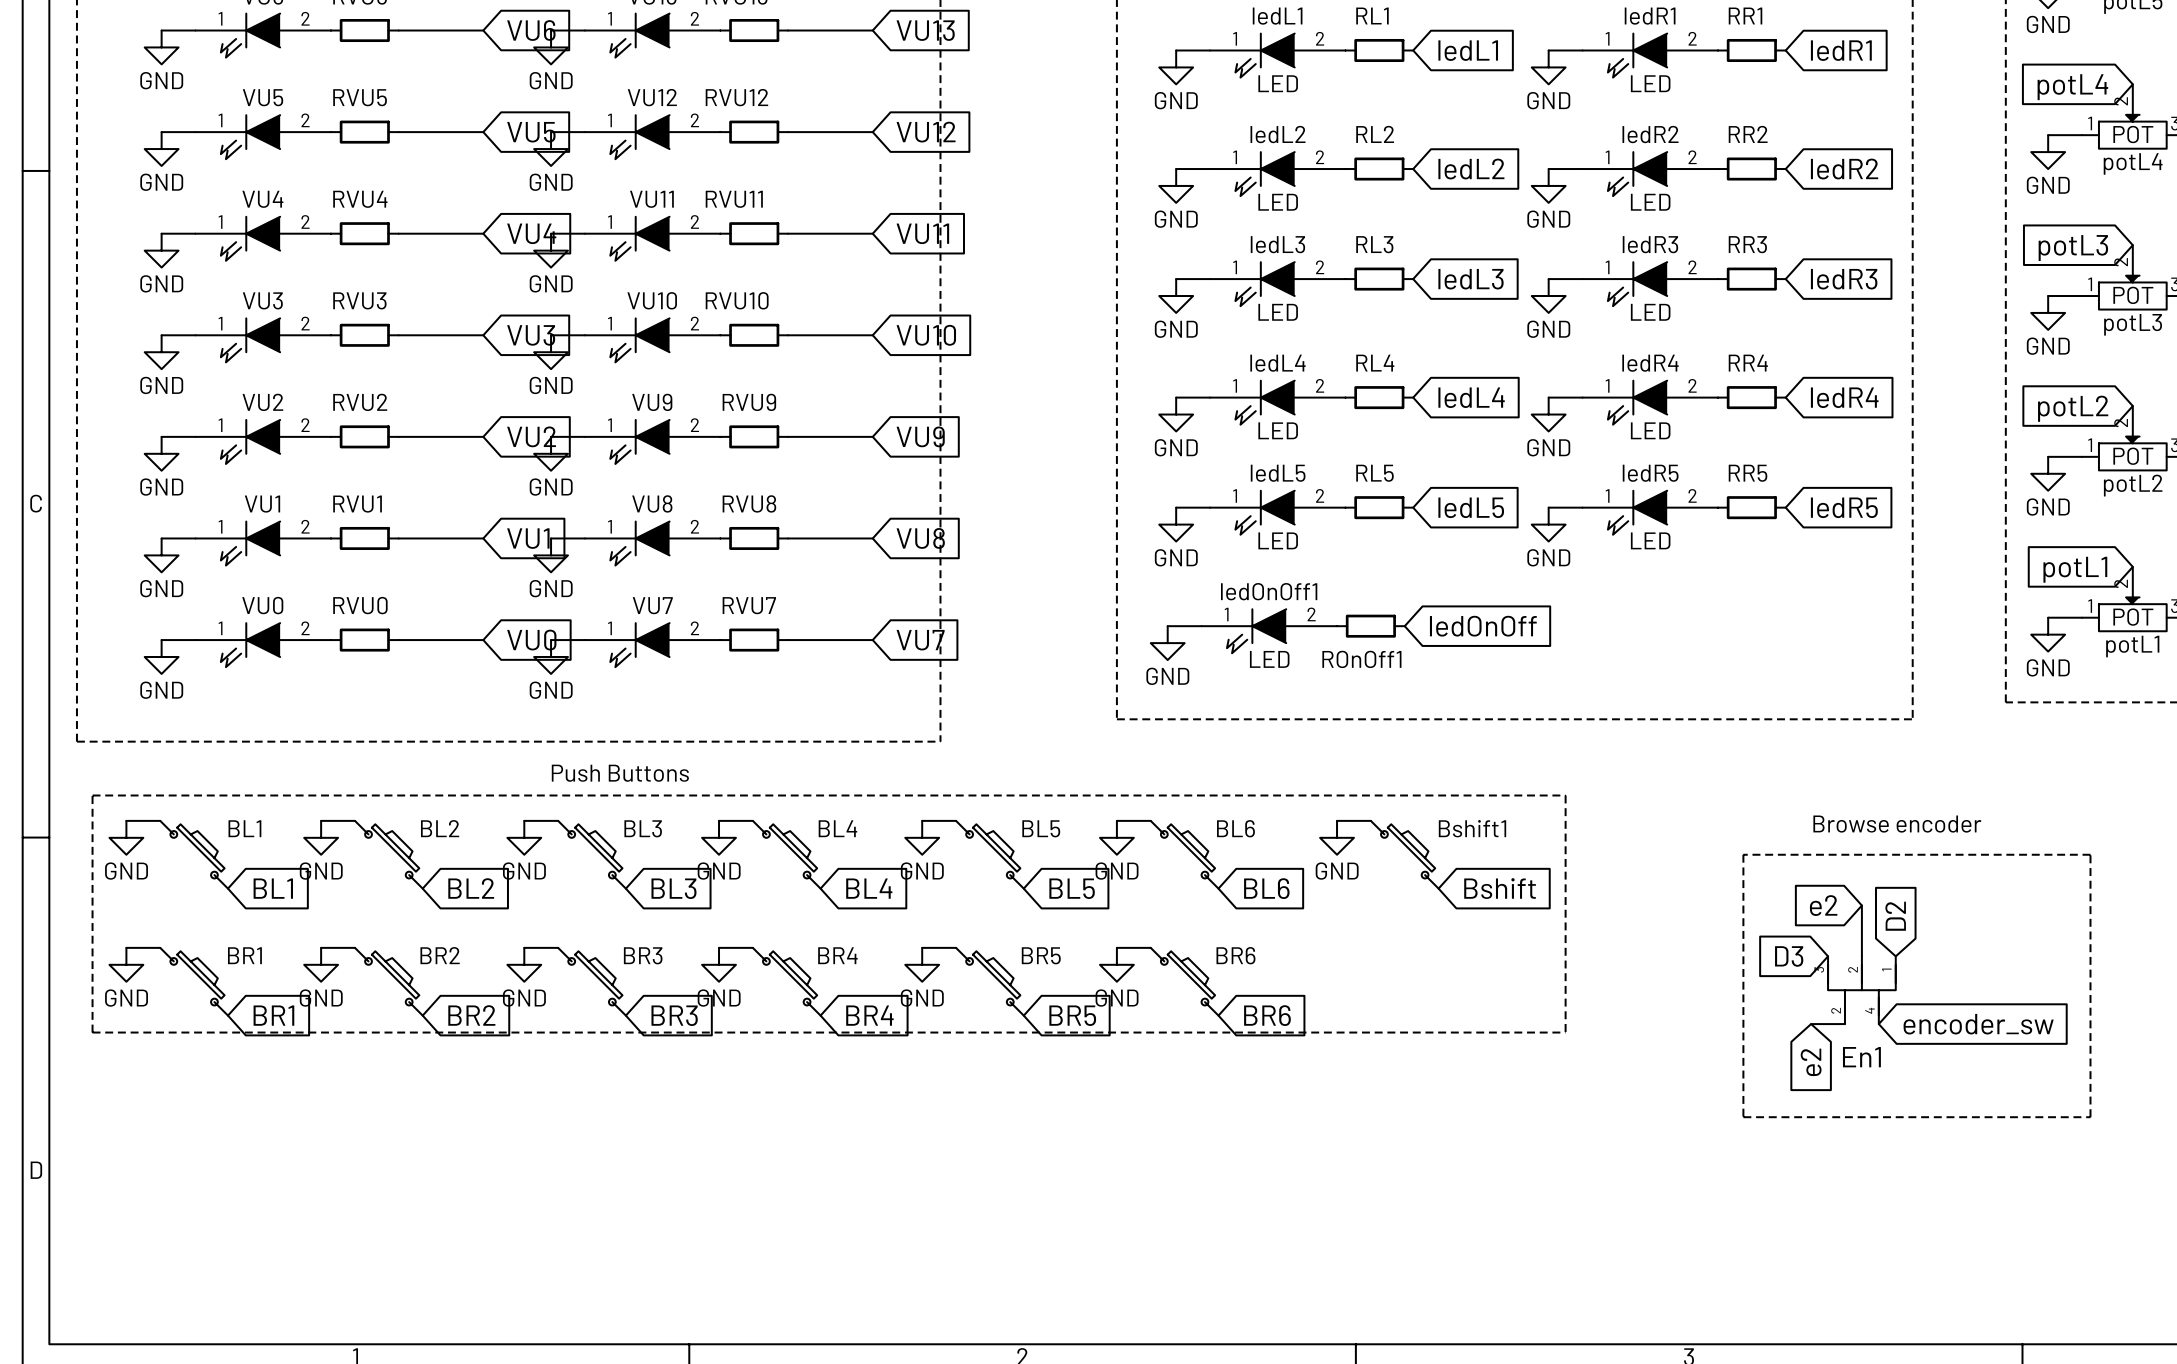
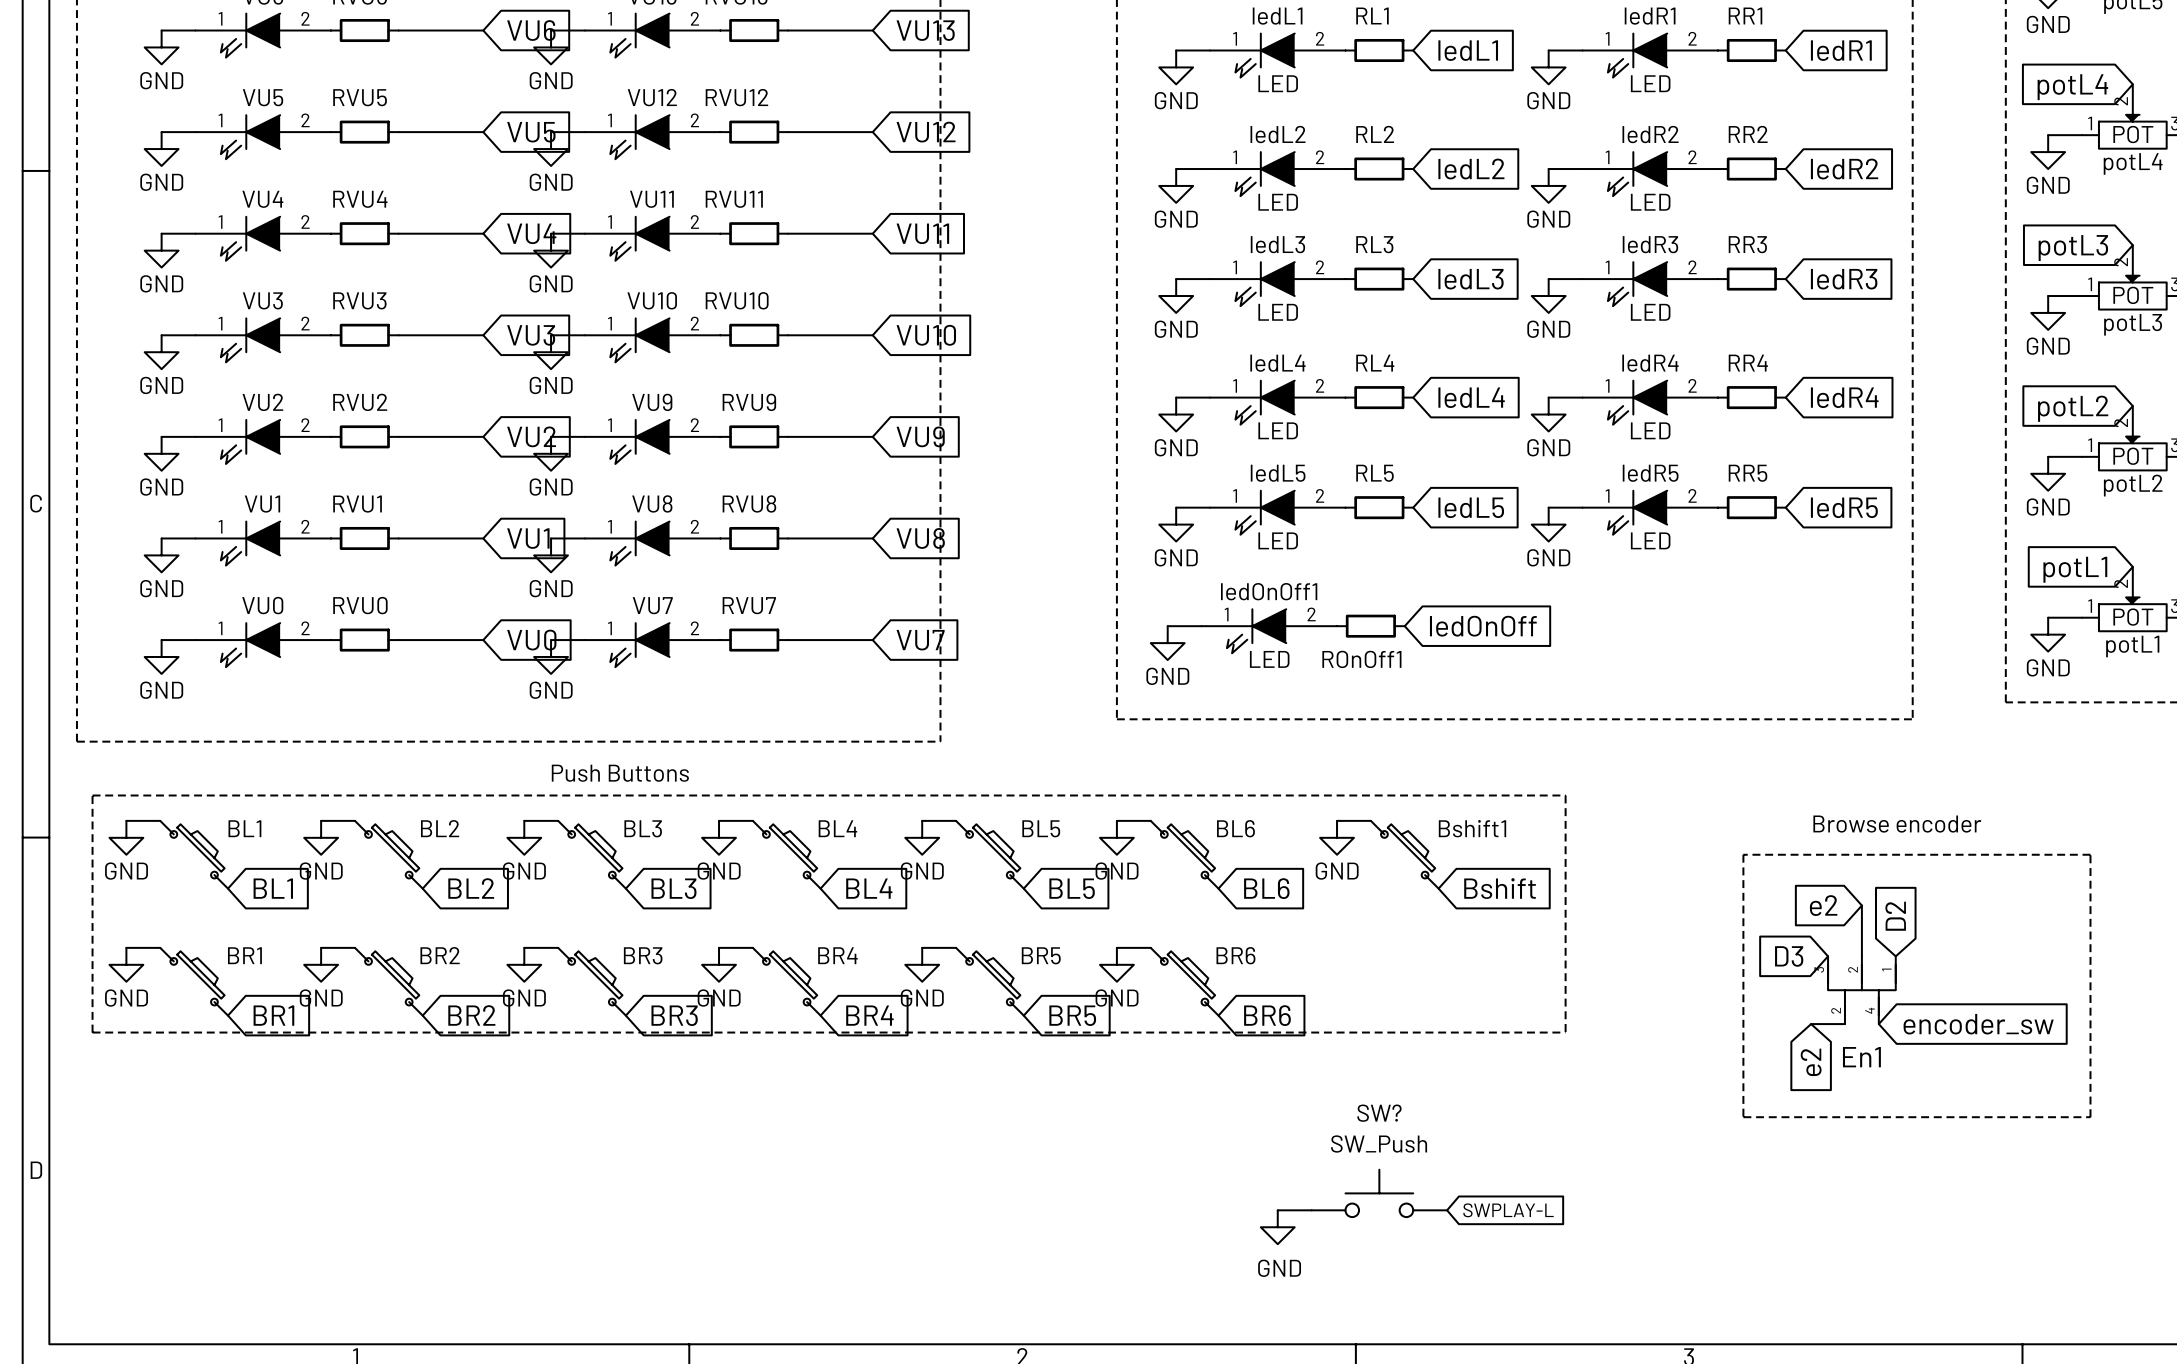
SW?: none -> SW_Push (1379, 1193)
wire: none -> (1277, 1210) (1311, 1210)
global label: none -> SWPLAY-L (1508, 1210)
power symbol: none -> GND (1277, 1227)

